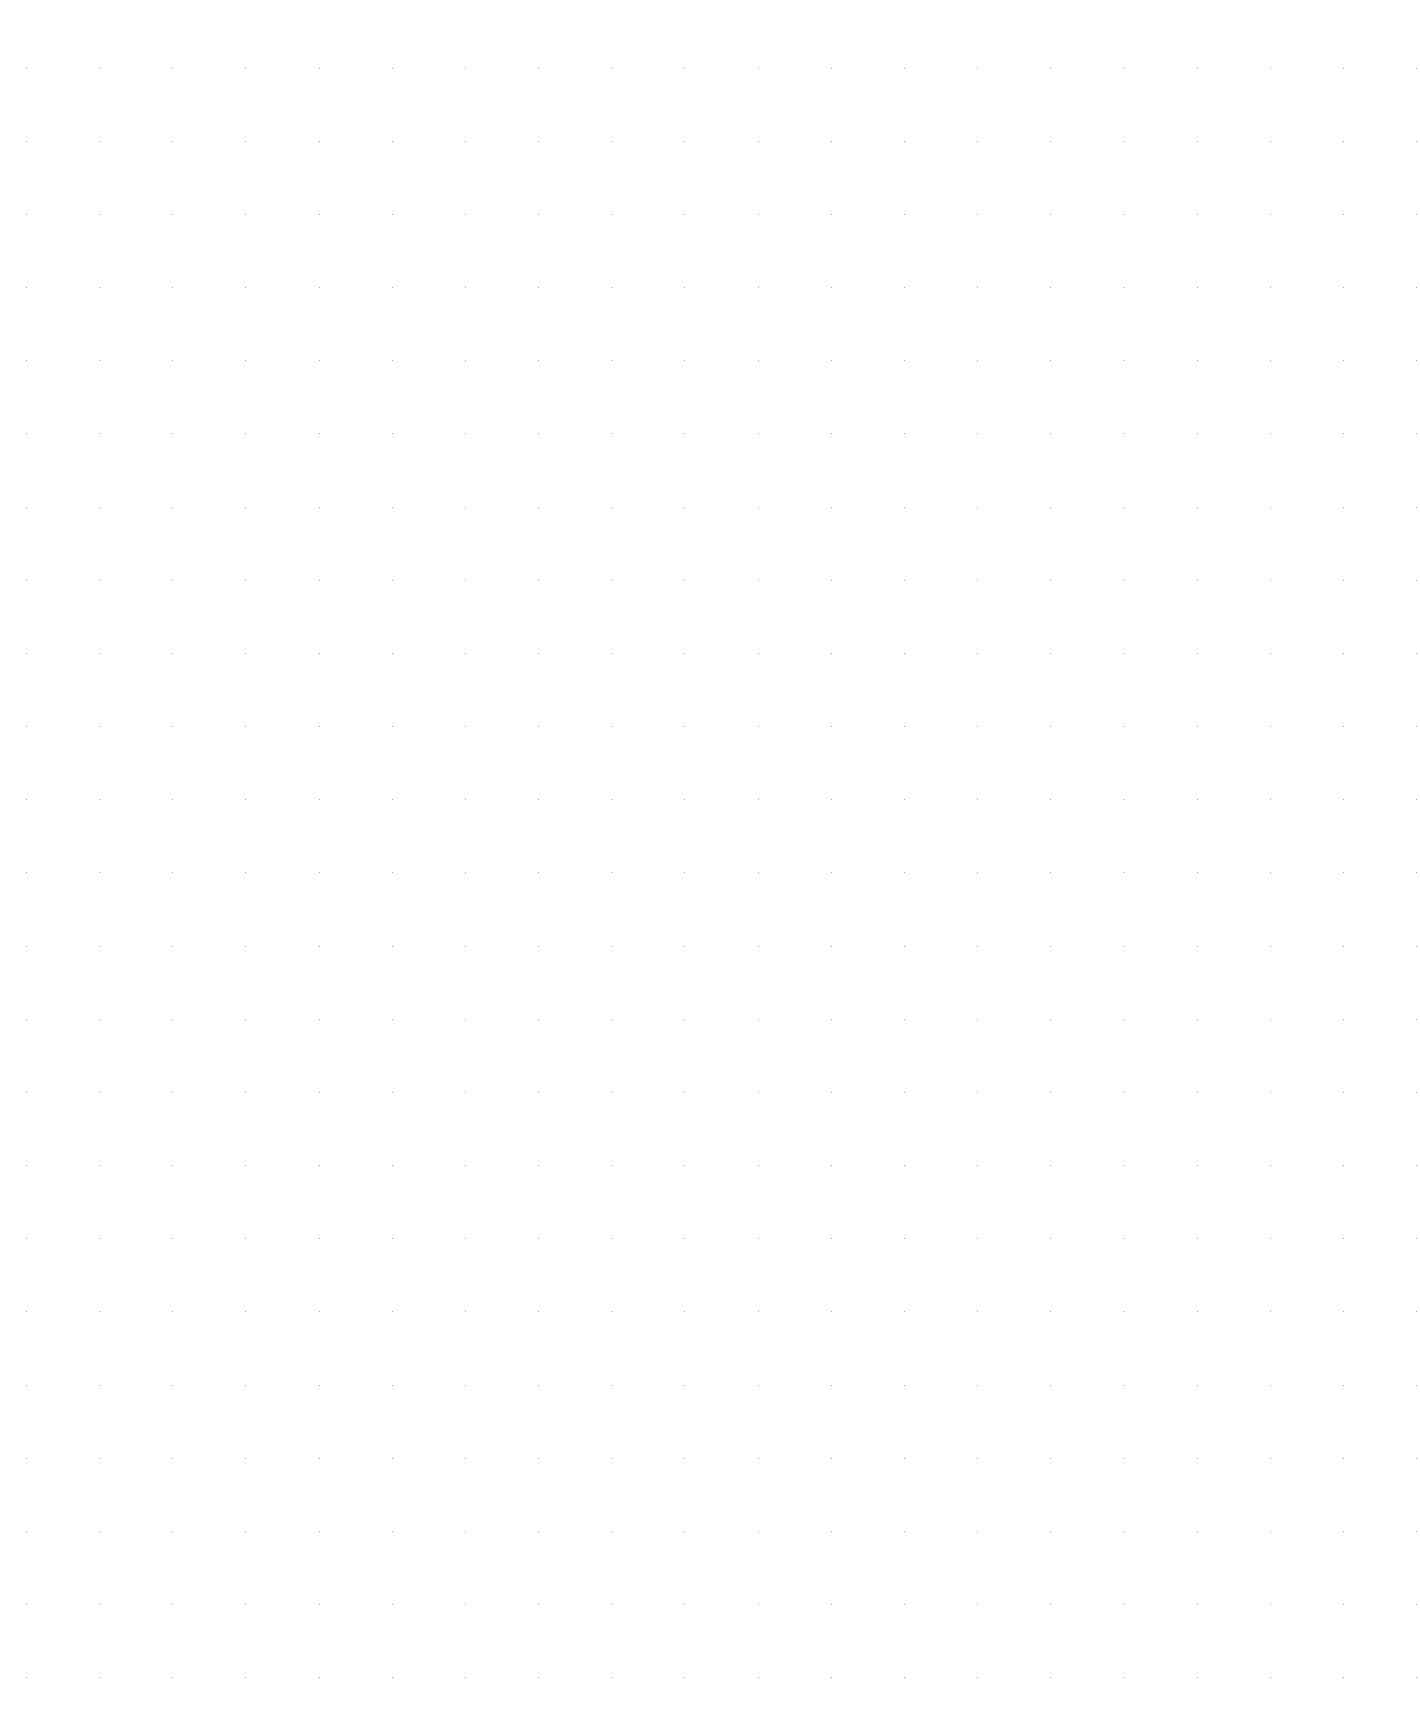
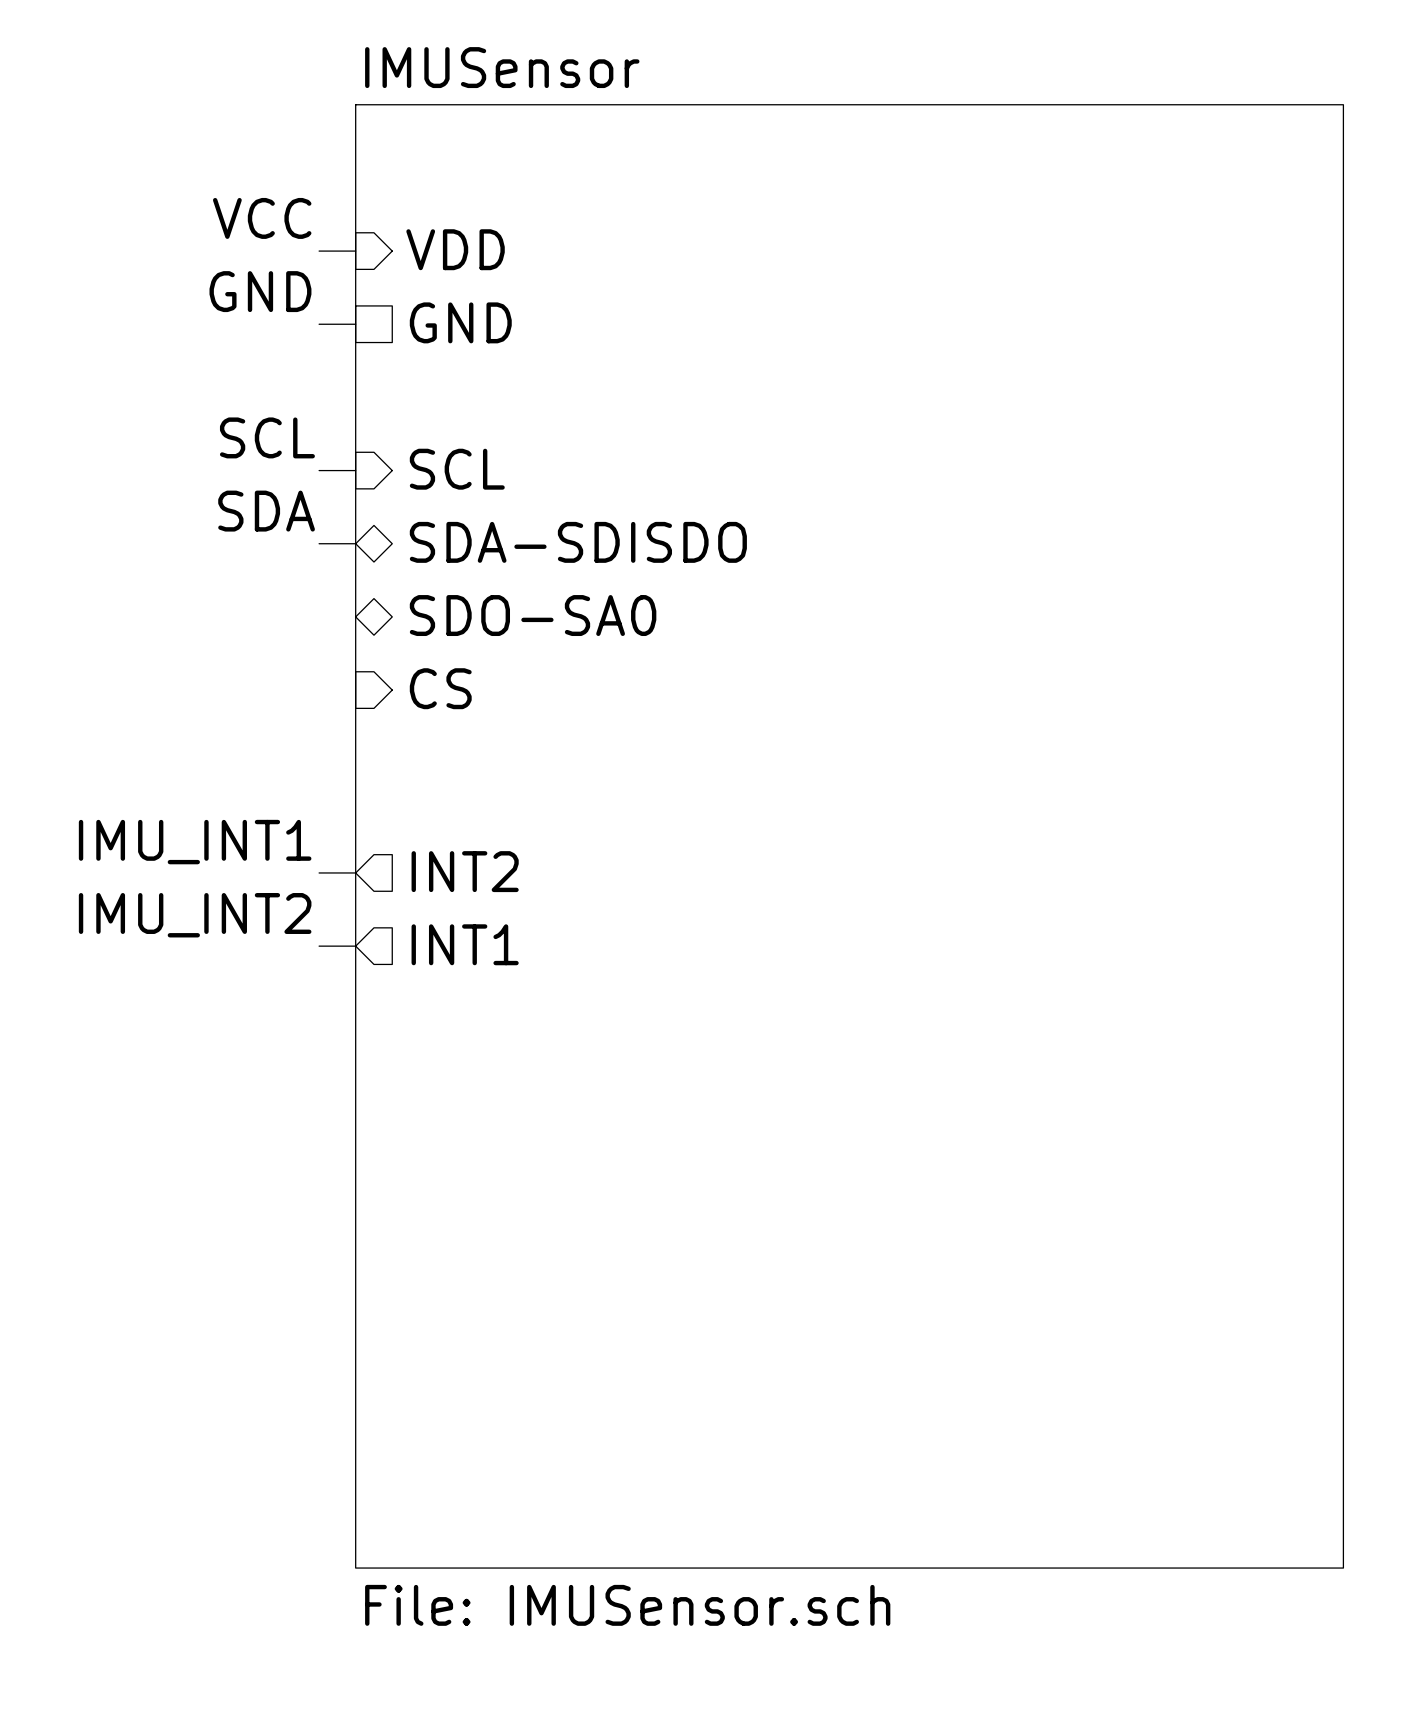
label: none -> VCC (262, 218)
sheet pin: none -> VDD (455, 249)
wire: none -> (319, 251) (355, 251)
label: none -> GND (260, 291)
sheet pin: none -> GND (460, 322)
wire: none -> (319, 324) (355, 324)
label: none -> SCL (267, 437)
sheet pin: none -> SCL (457, 469)
wire: none -> (319, 470) (355, 470)
label: none -> SDA (266, 511)
sheet pin: none -> SDA-SDISDO (578, 542)
wire: none -> (319, 543) (355, 543)
sheet pin: none -> SDO-SA0 (533, 615)
sheet pin: none -> CS (440, 688)
sheet IMUSensor: none -> File: IMUSensor.sch (849, 836)
label: none -> IMU_INT1 (195, 842)
sheet pin: none -> INT2 (465, 871)
wire: none -> (319, 872) (355, 872)
label: none -> IMU_INT2 (195, 915)
sheet pin: none -> INT1 (465, 944)
wire: none -> (319, 946) (355, 946)

